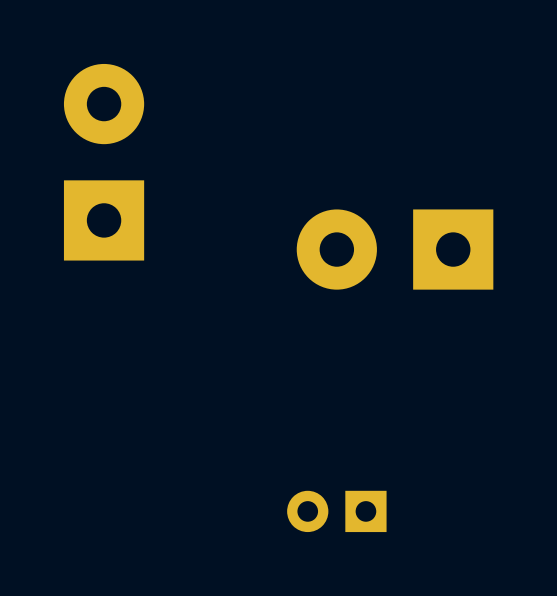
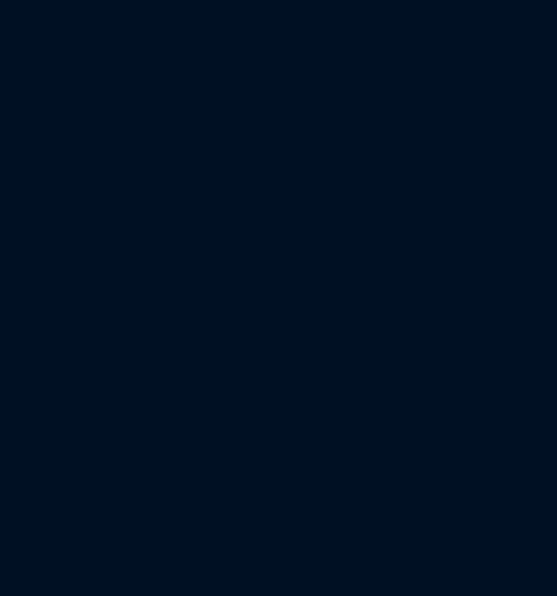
part: (104, 162) -> none
part: (395, 249) -> none
part: (336, 511) -> none

